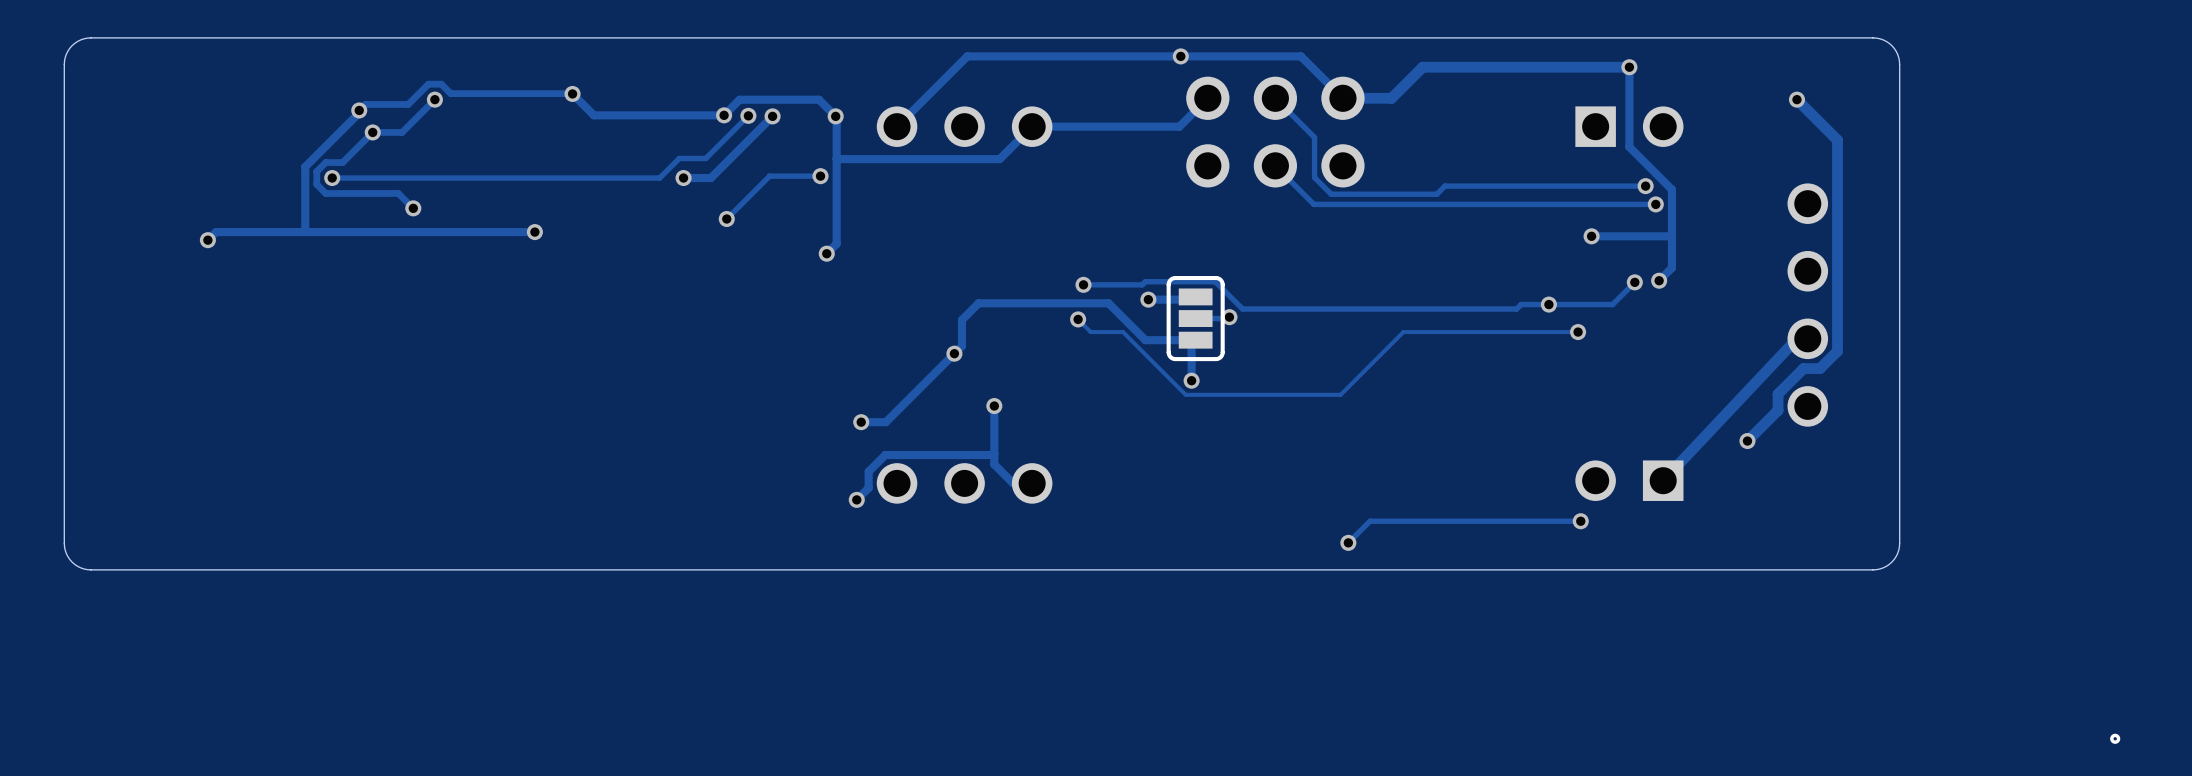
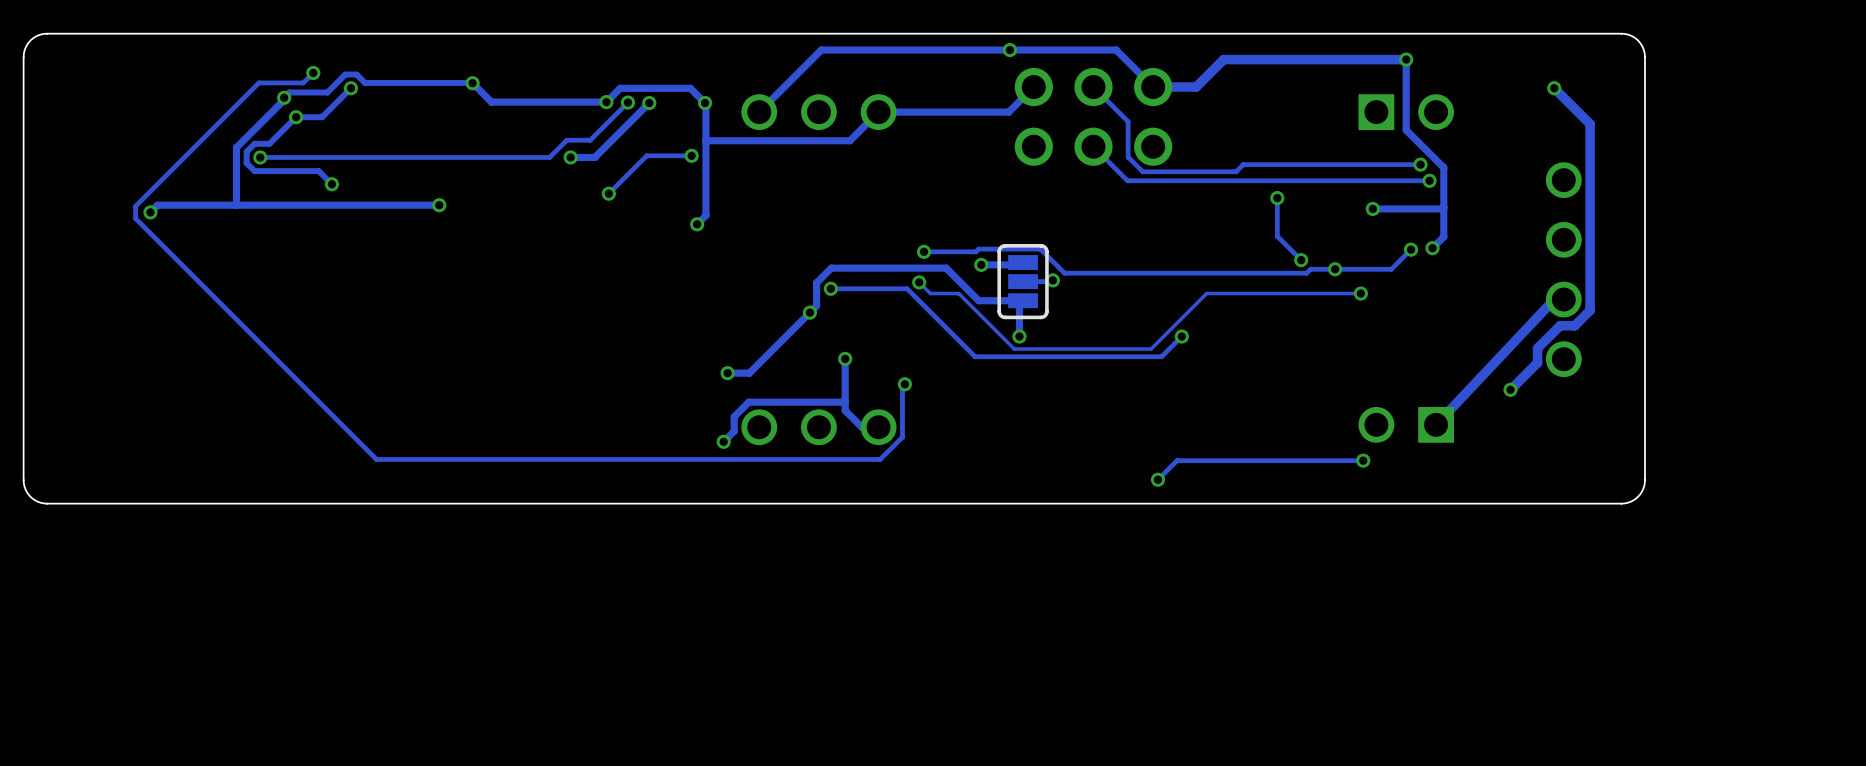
track: none -> (313, 72) (303, 82) (258, 82) (135, 206) (135, 218) (376, 459) (880, 459) (902, 437) (902, 386) (904, 384)
via: none -> (313, 72)
track: none -> (1277, 198) (1277, 236) (1301, 260)
via: none -> (1277, 198)
via: none -> (1301, 260)
track: none -> (830, 288) (907, 288) (975, 356) (1161, 356) (1181, 336)
via: none -> (830, 288)
via: none -> (1181, 336)
via: none -> (904, 384)
part: (2115, 738) -> none

